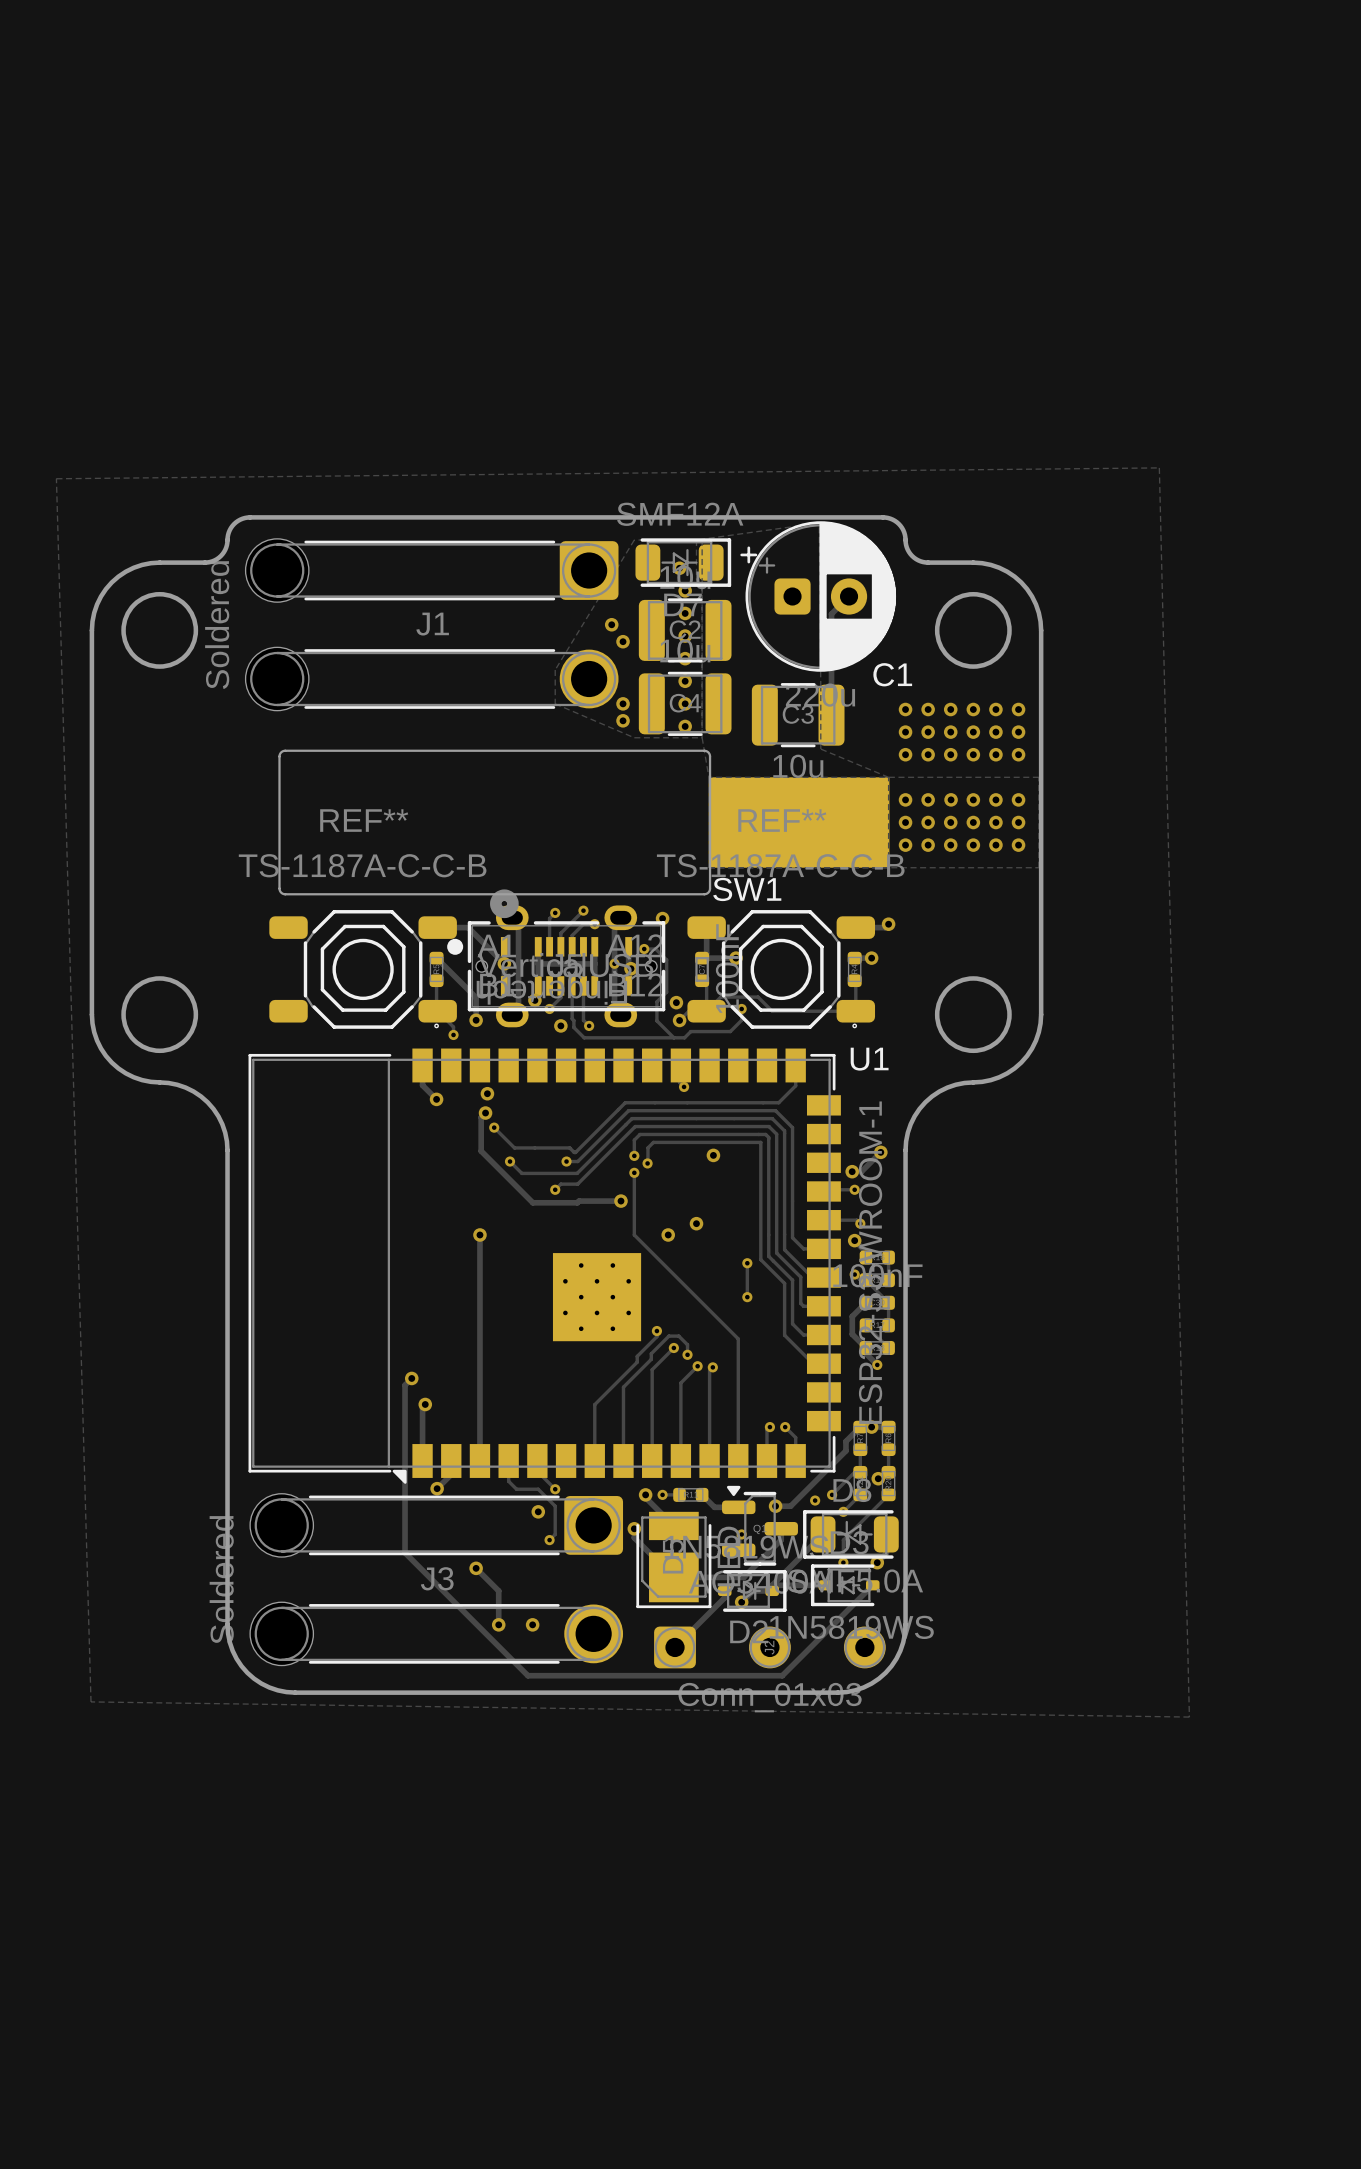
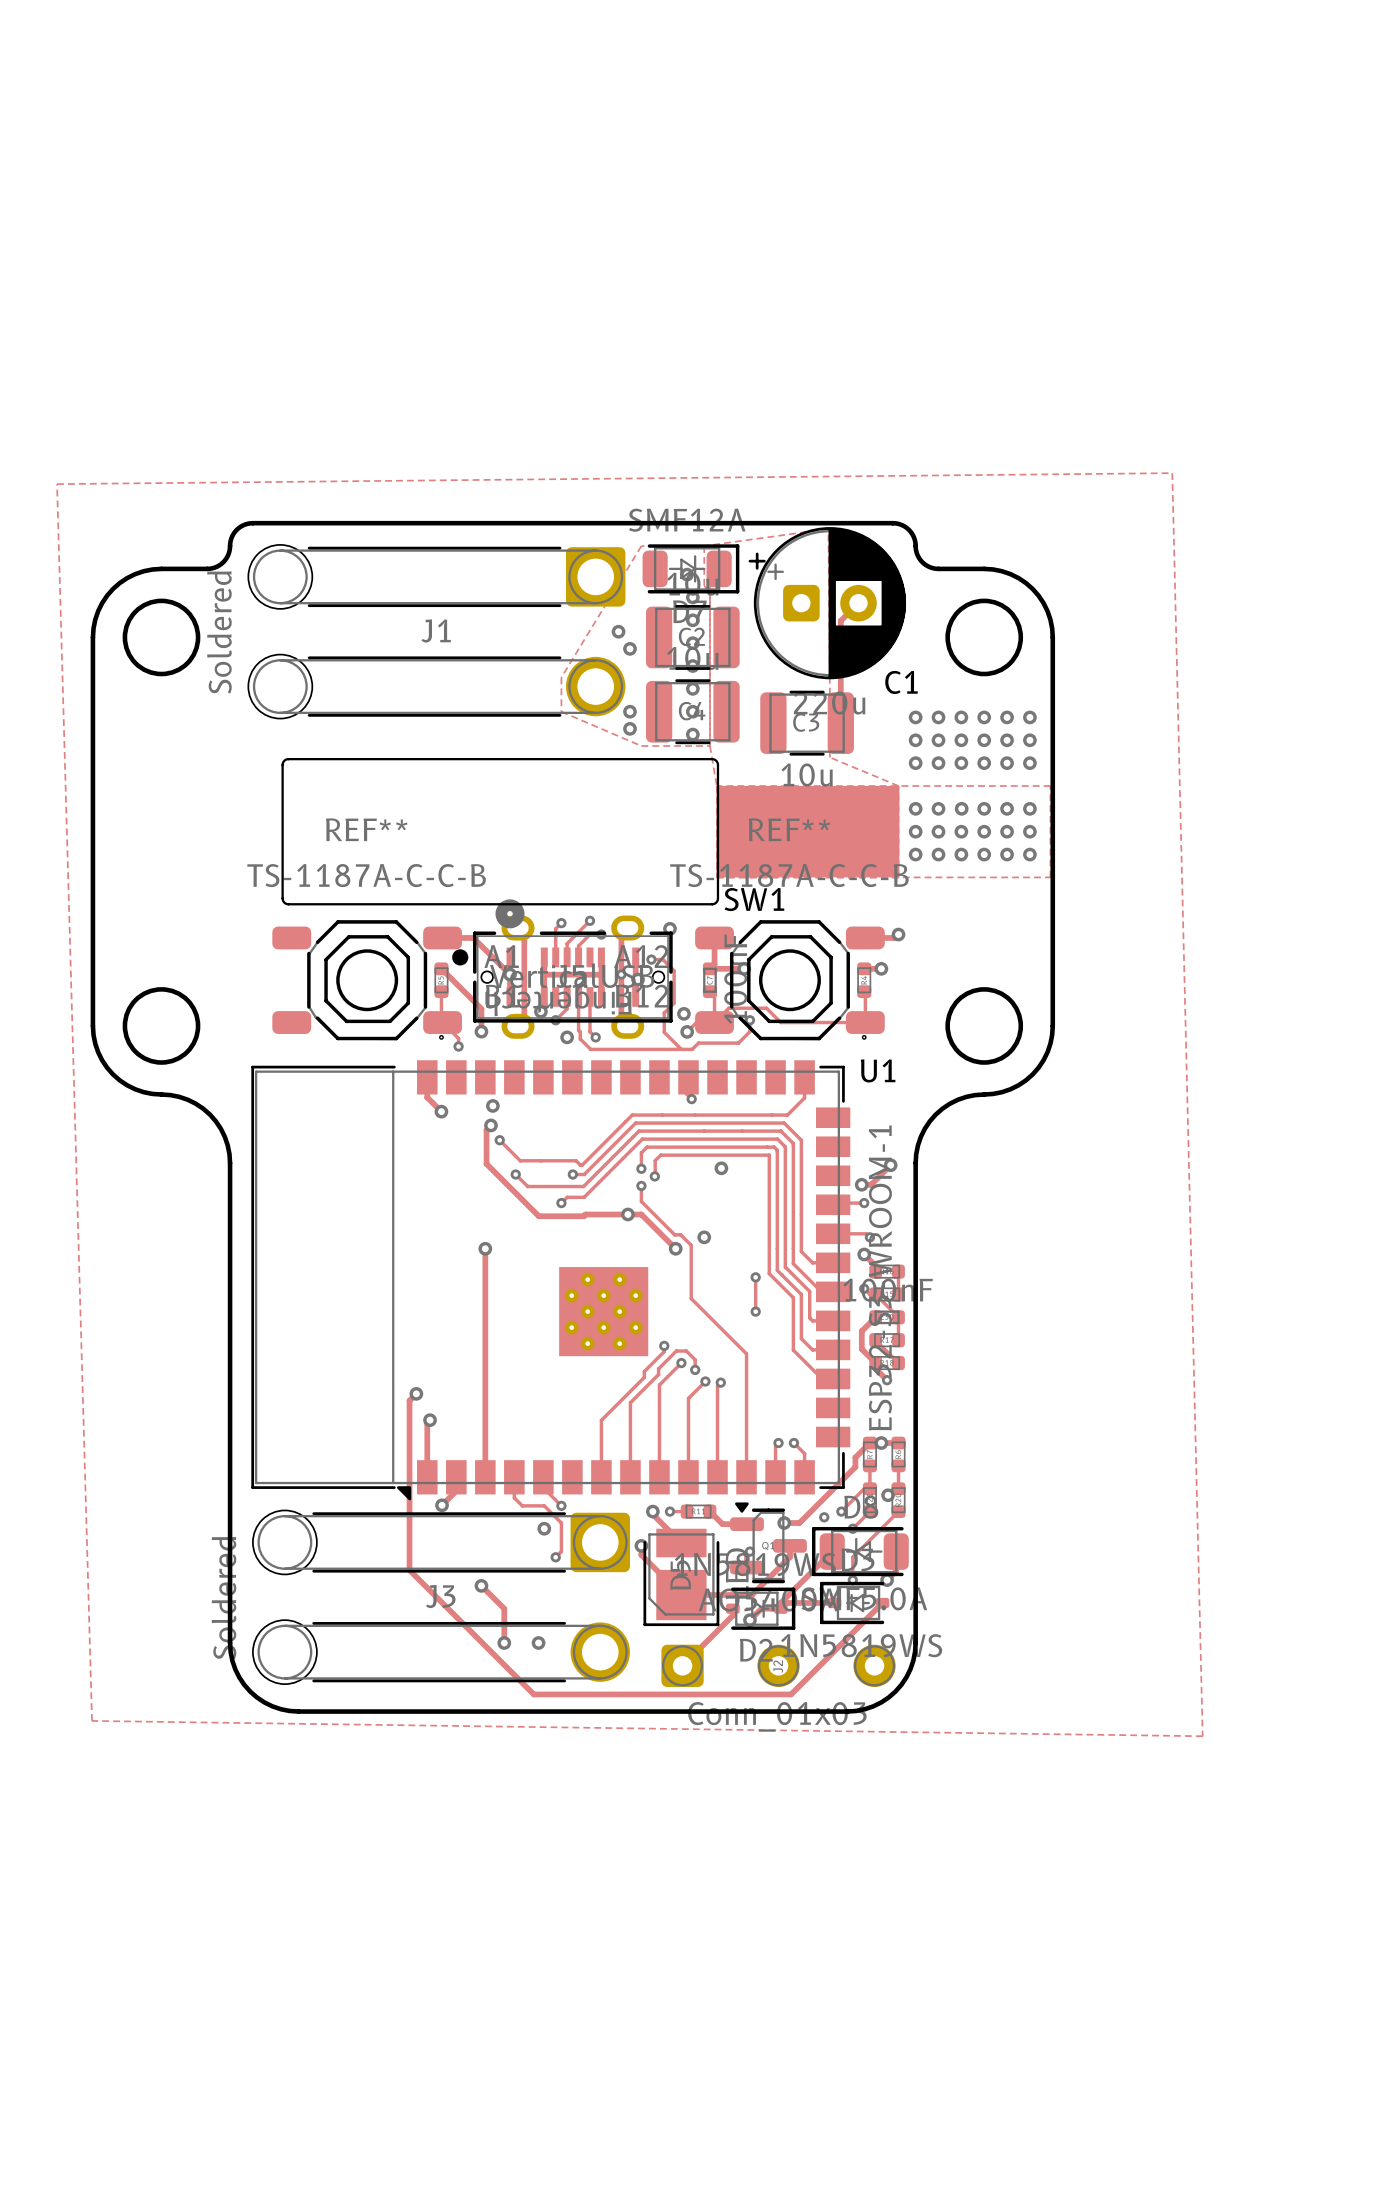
track: (634, 1188) (634, 1234) (683, 1284) -> (641, 1201) (674, 1234) (680, 1234) (691, 1245) (691, 1298)
track: none -> (627, 1214) (641, 1214) (675, 1248)

